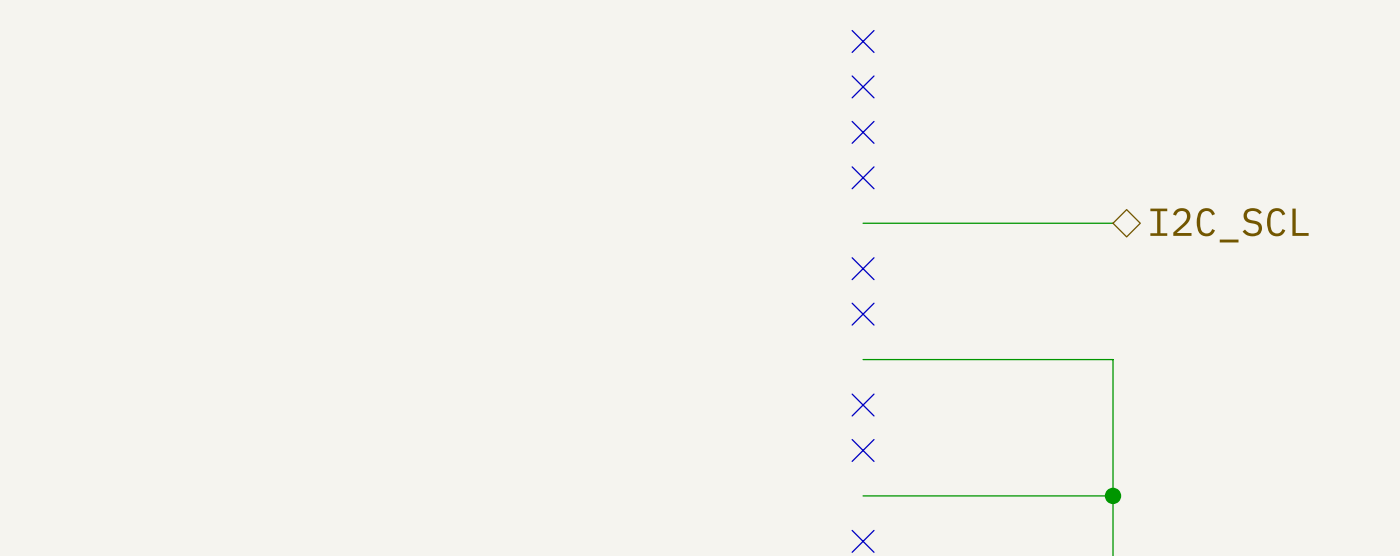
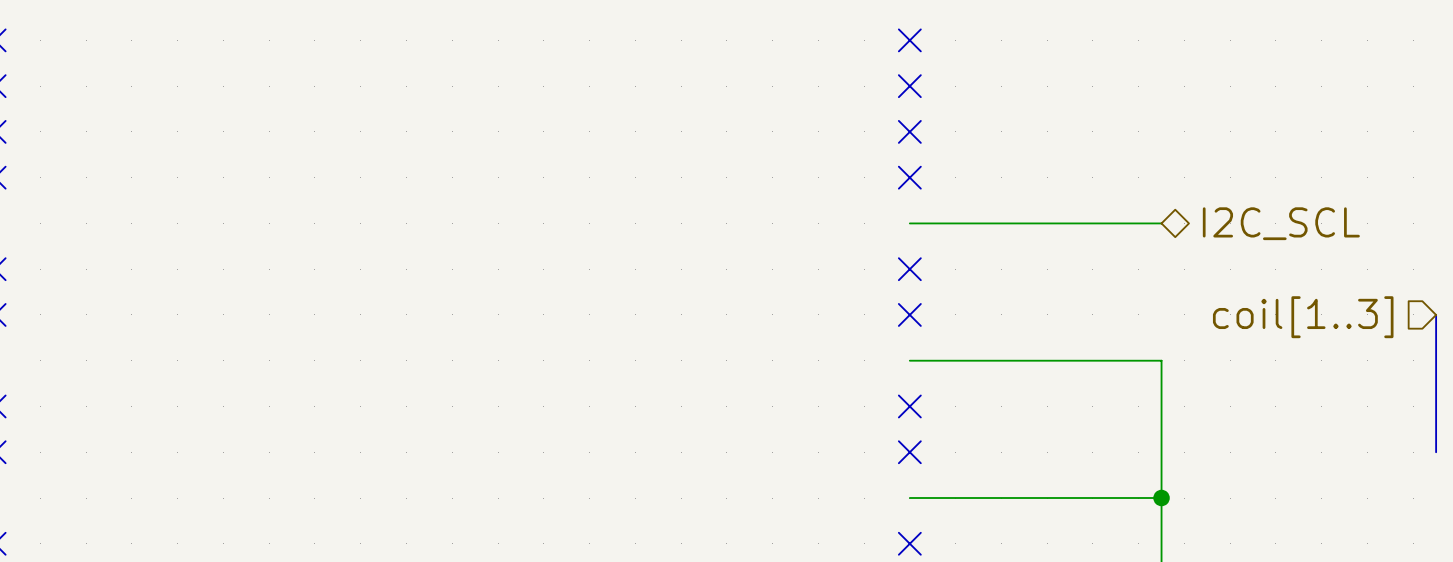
hierarchical label: none -> coil[1..3] (1303, 317)
bus: none -> (1436, 314) (1436, 452)

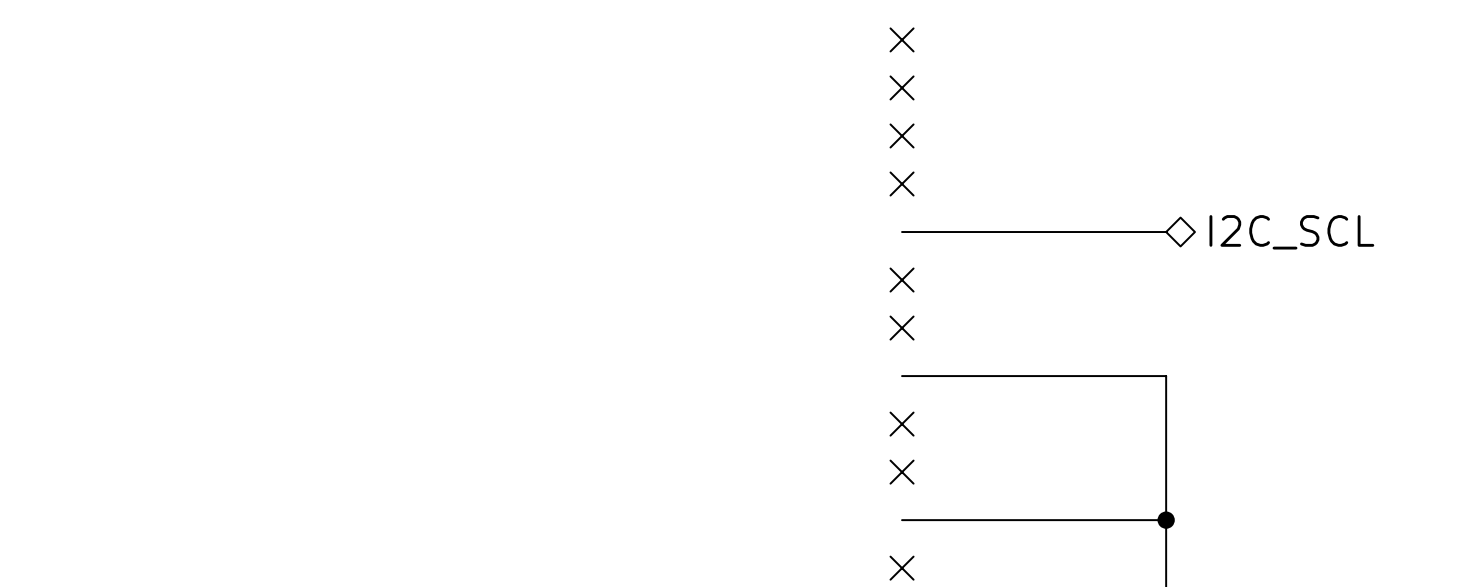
bus: (1436, 314) (1436, 452) -> none
hierarchical label: coil[1..3] (1303, 317) -> none

